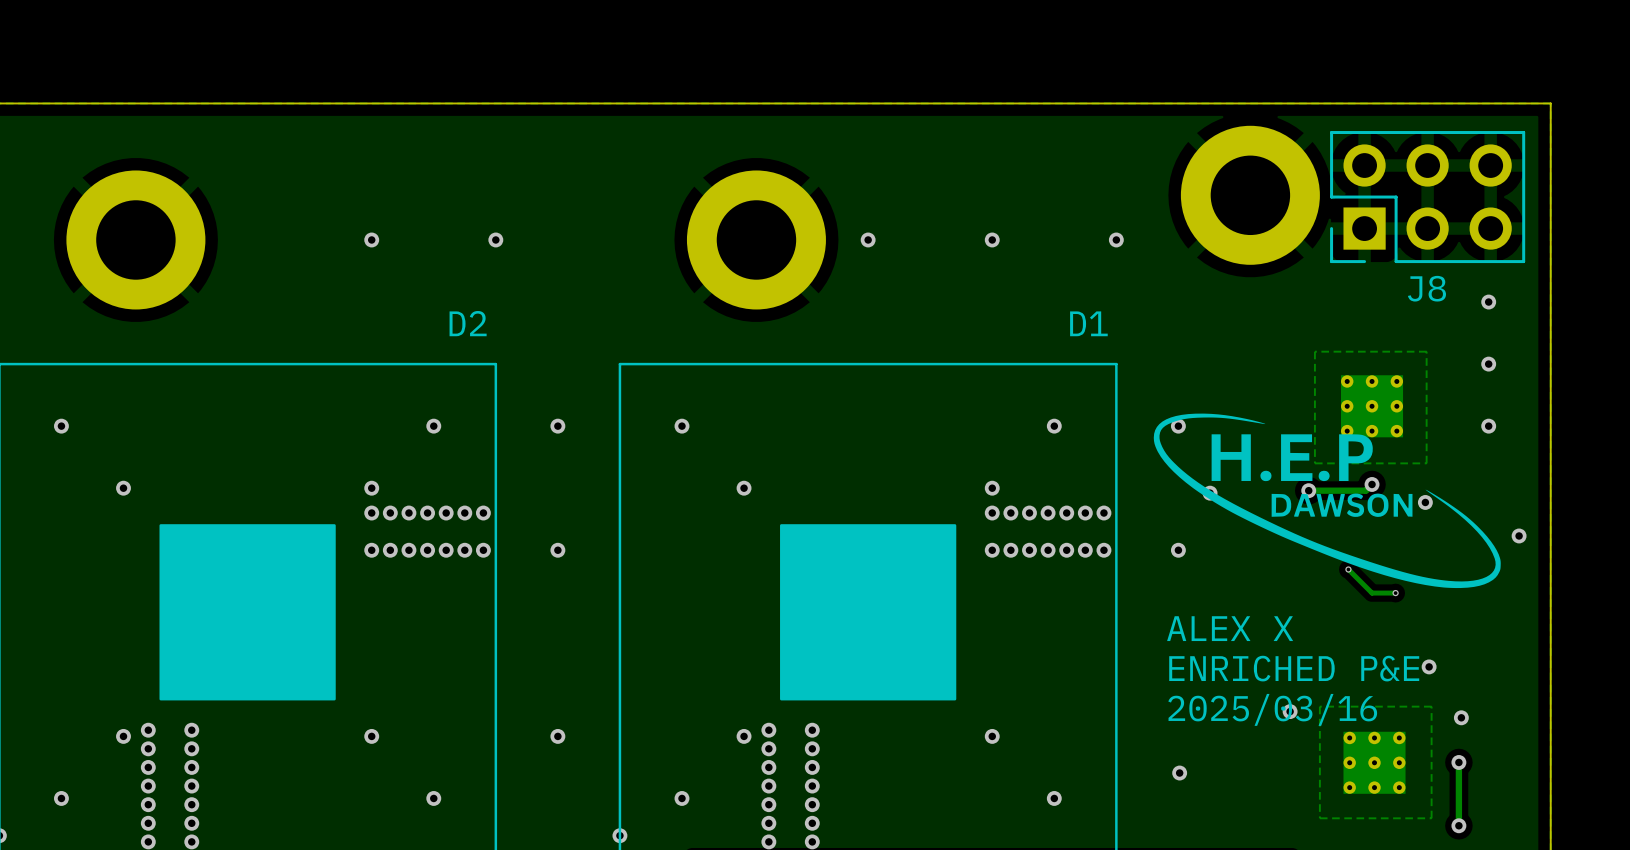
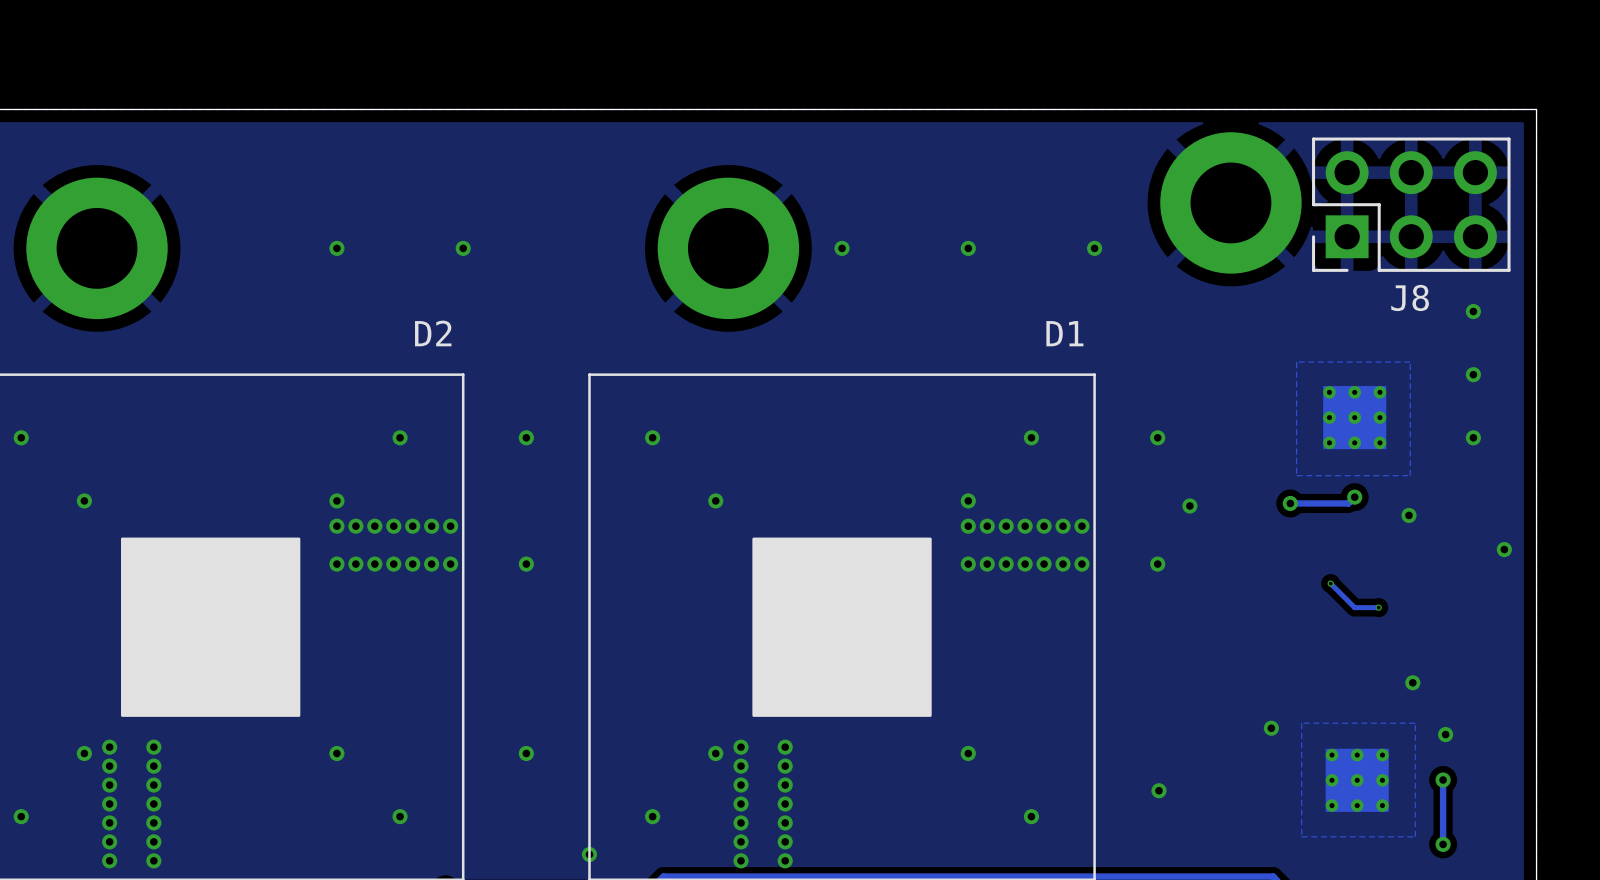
drawing: [1153, 413, 1501, 589] -> none
text: ALEX X (1230, 628) -> none
text: ENRICHED P&E (1294, 668) -> none
text: 2025/03/16 (1272, 709) -> none

